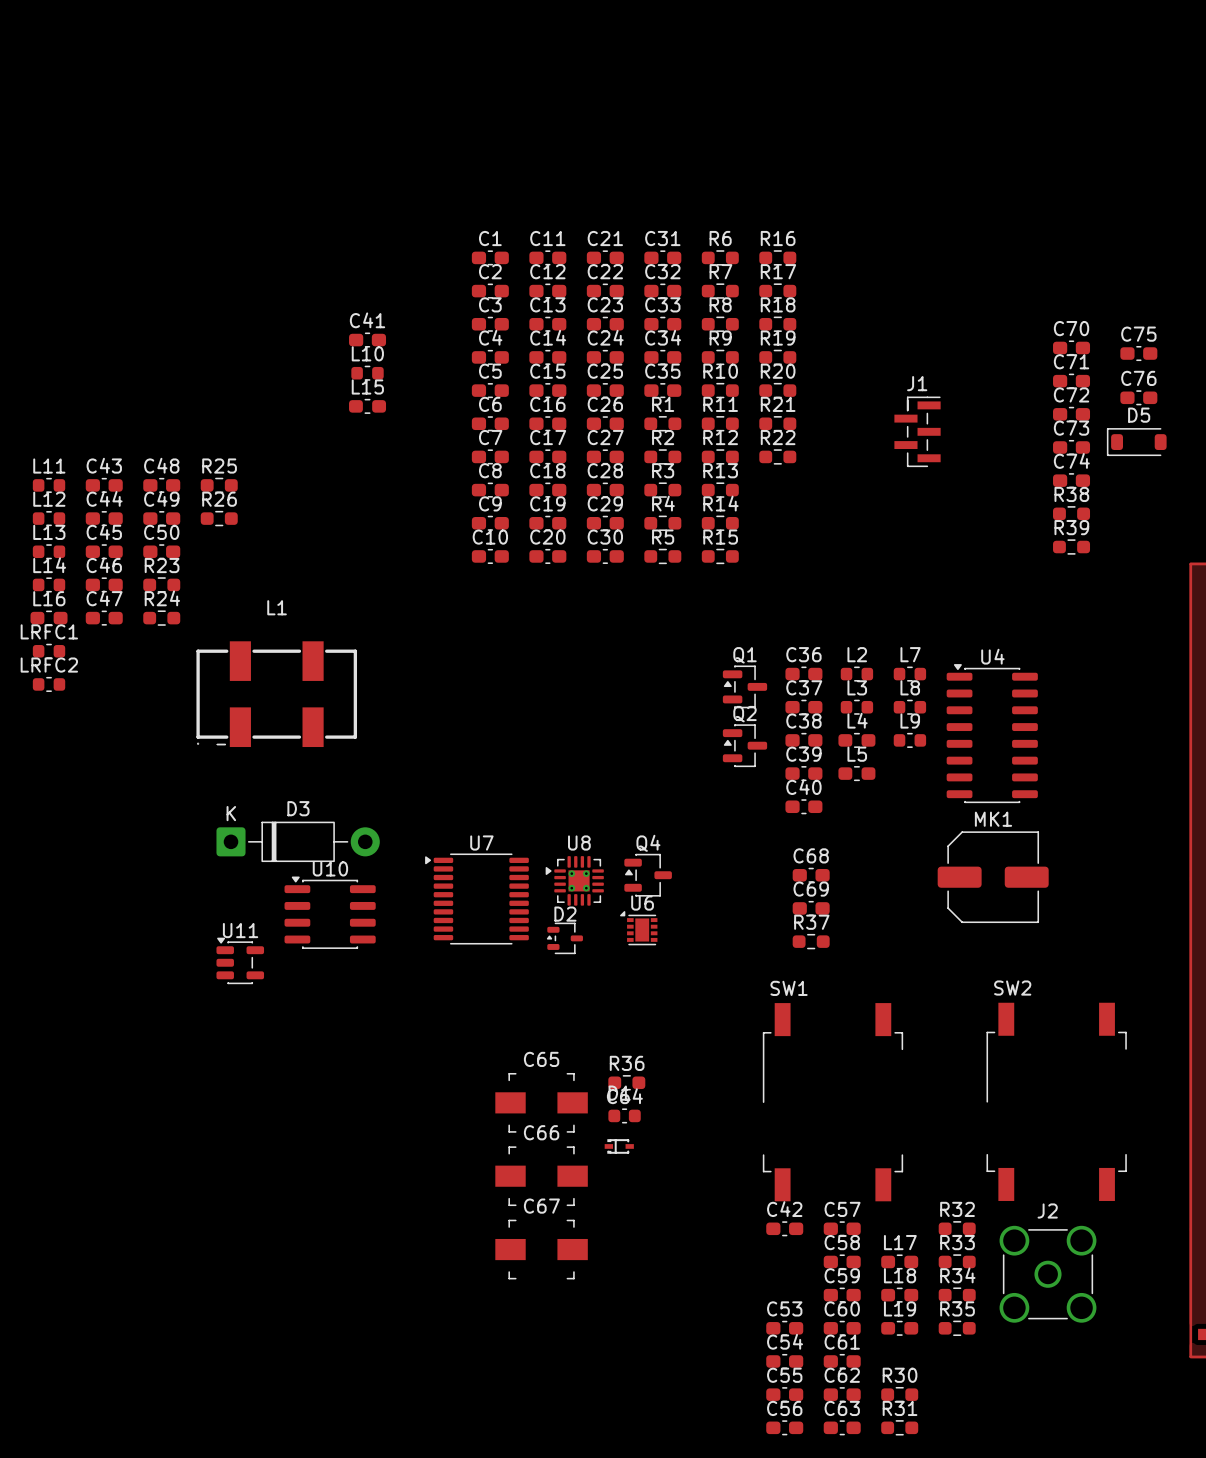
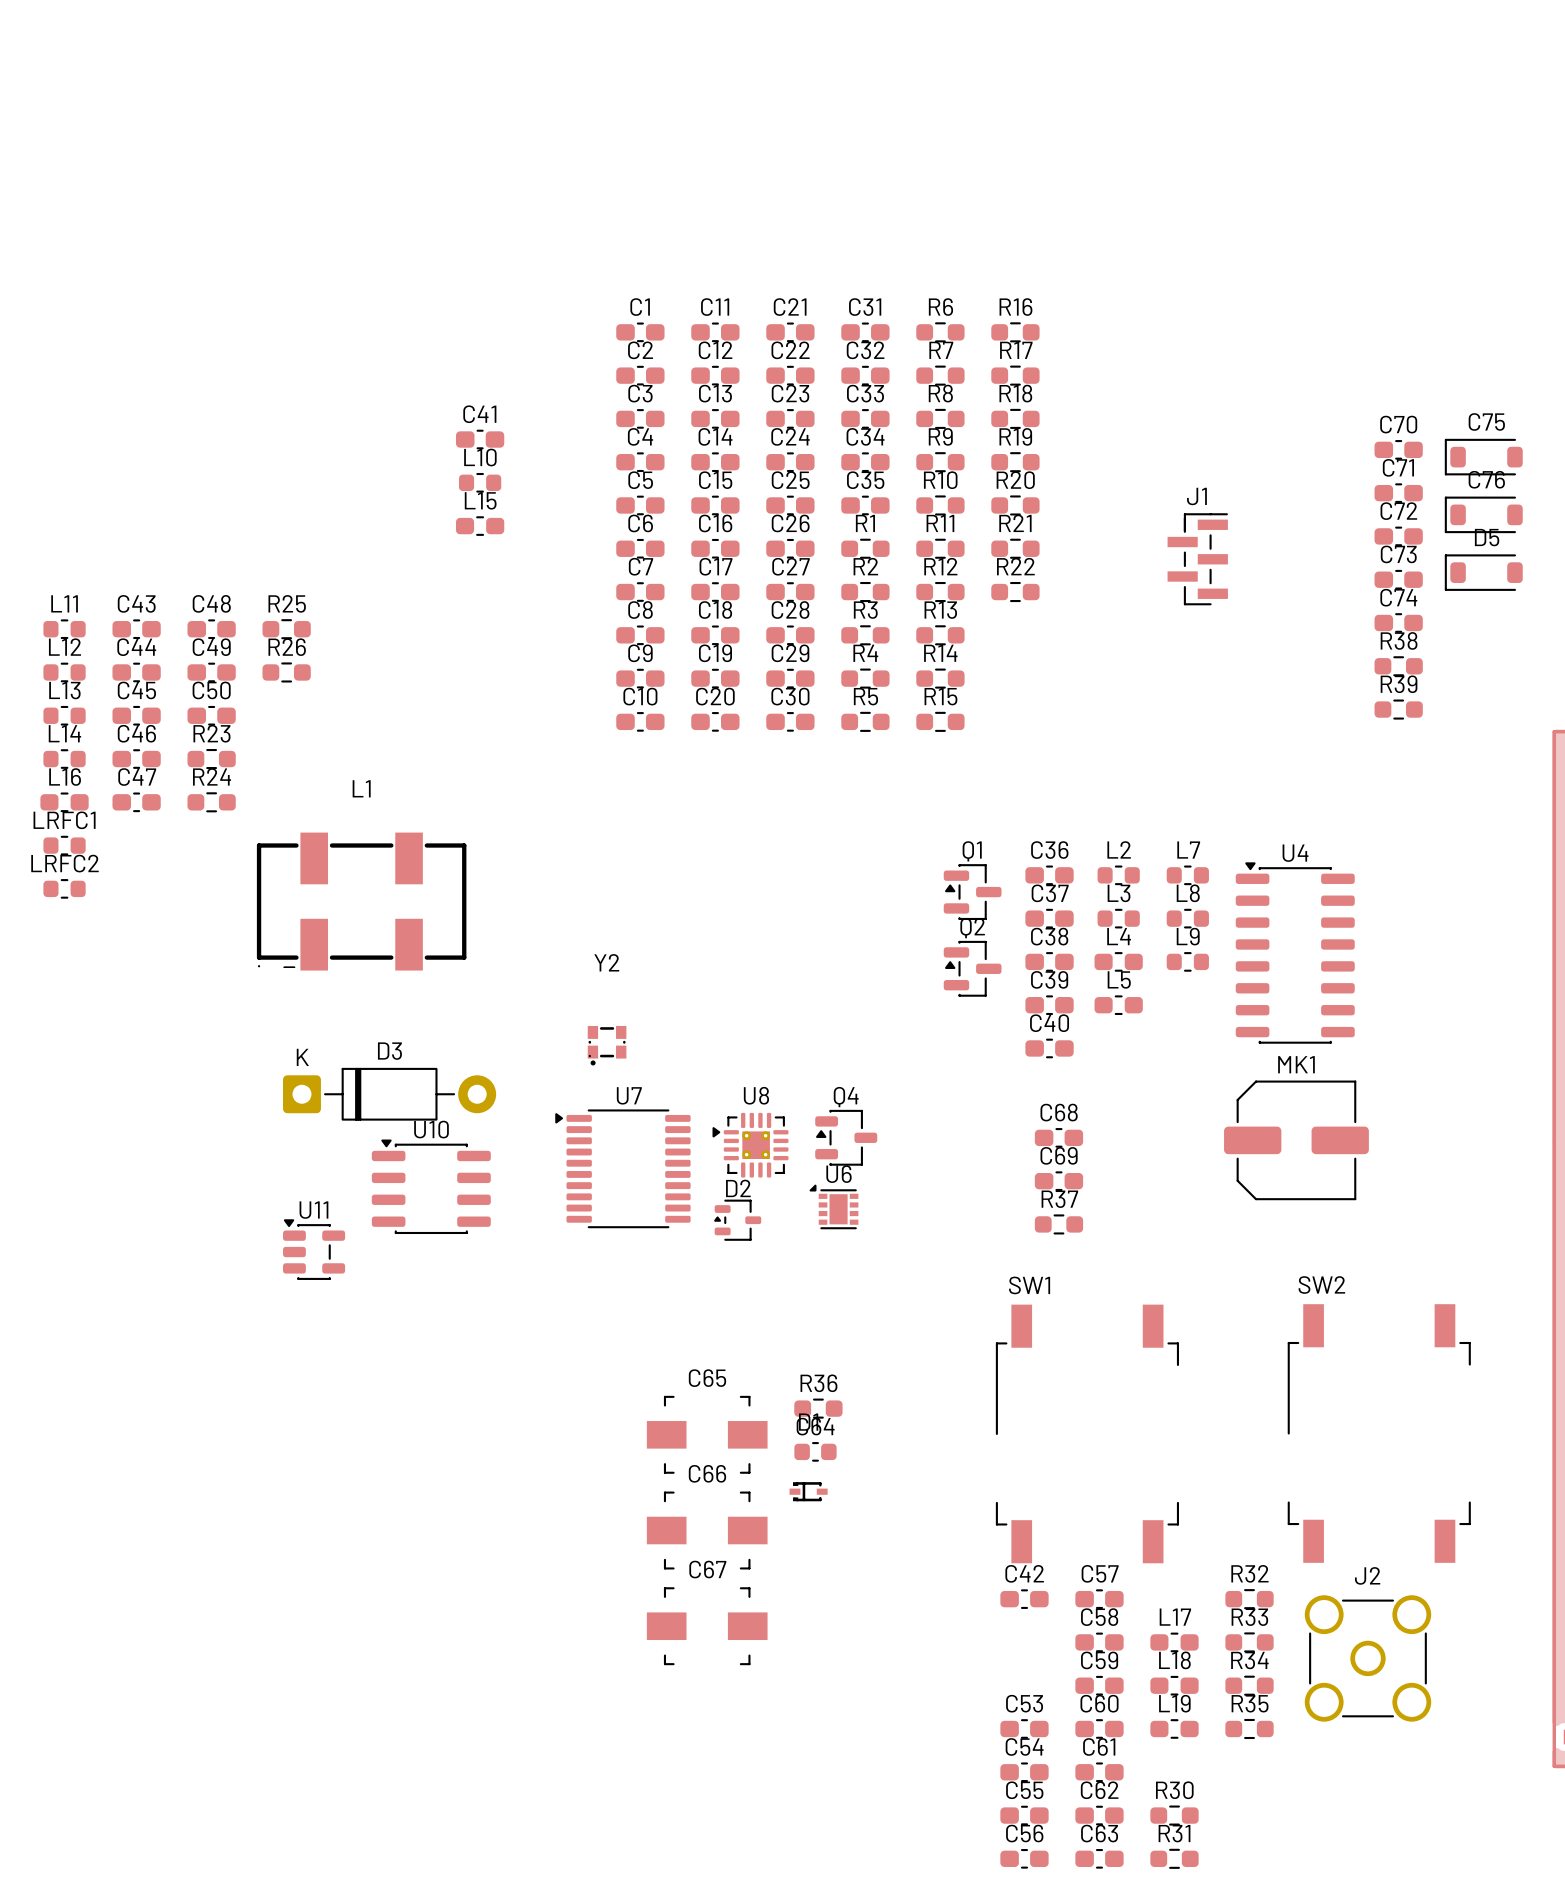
C75 footprint: [1120, 345, 1158, 362] -> [1444, 438, 1523, 476]
C76 footprint: [1120, 390, 1158, 406] -> [1444, 496, 1523, 534]
Y2: none -> (607, 1045)

